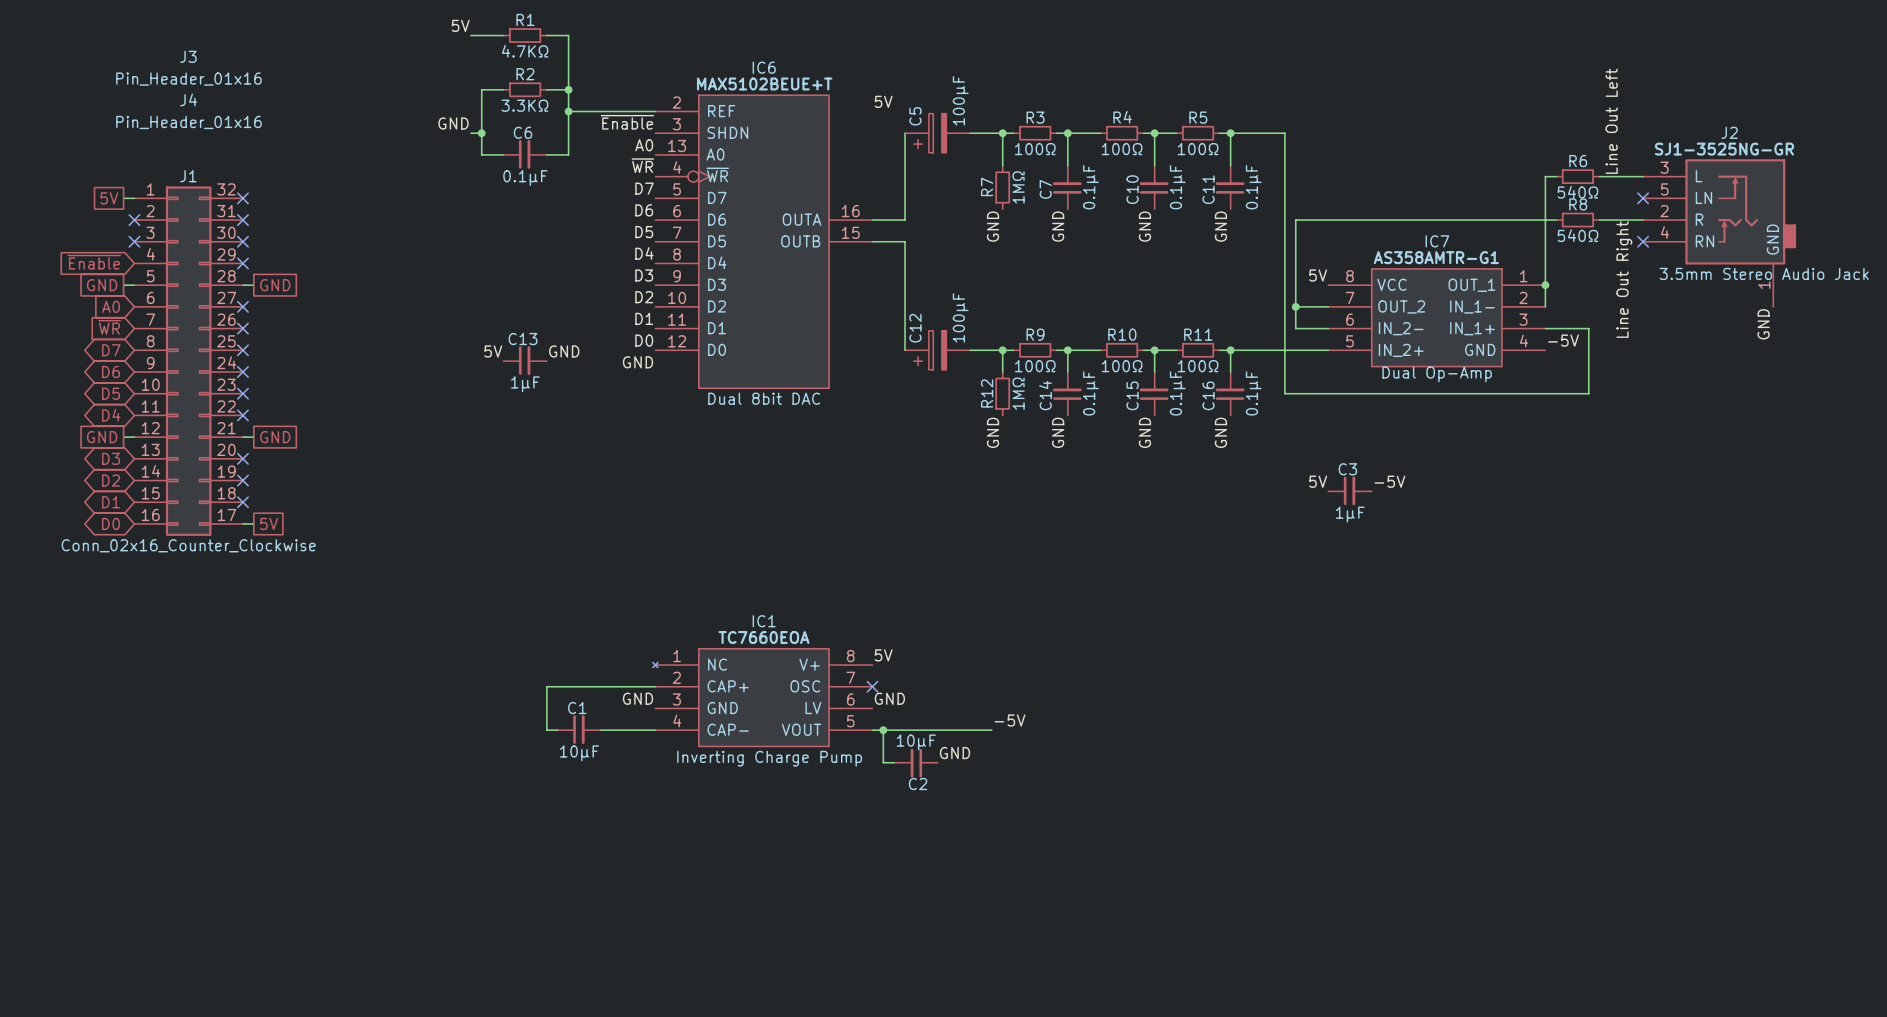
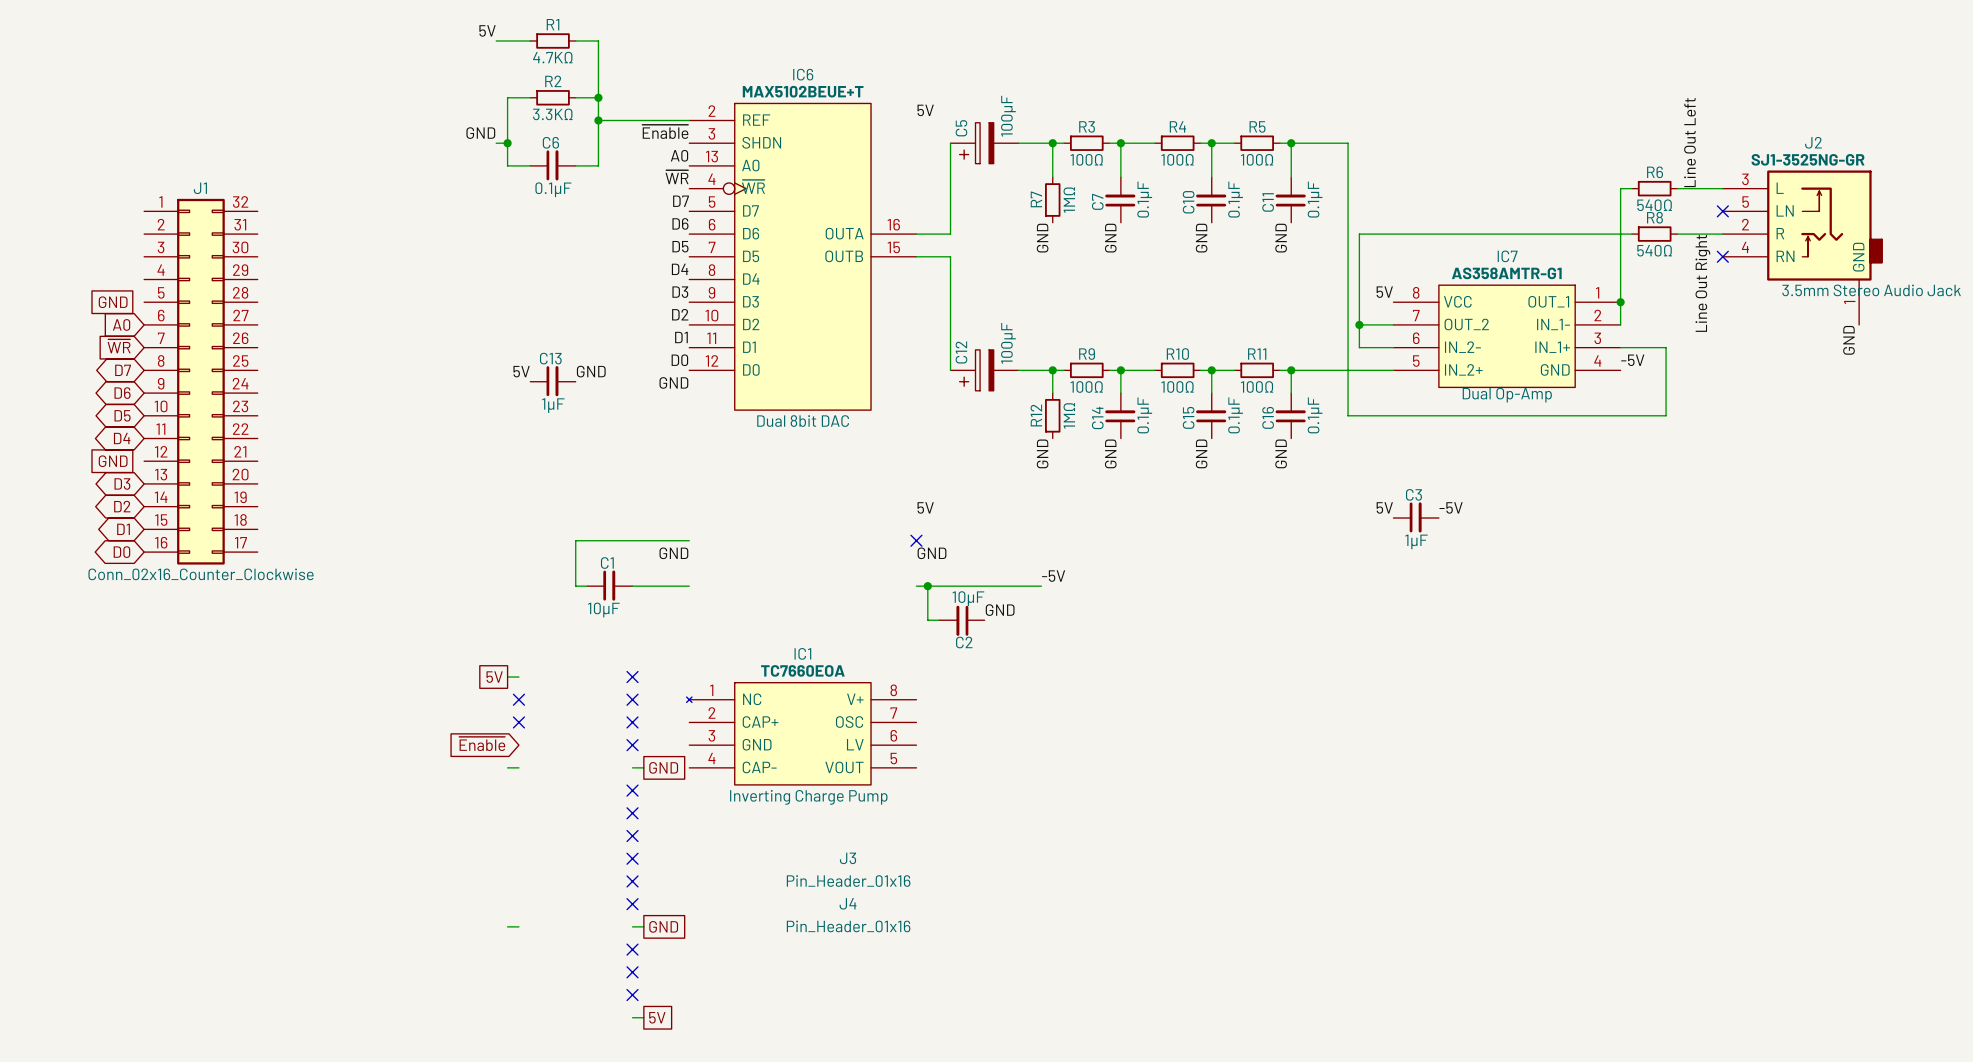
J3 position: (188, 68) -> (848, 869)
J4 position: (188, 111) -> (848, 915)
global label: 5V (109, 198) -> none
wire: (123, 198) (134, 198) -> none
no-connect mark: (242, 198) -> none
no-connect mark: (134, 220) -> none
no-connect mark: (242, 220) -> none
no-connect mark: (134, 241) -> none
no-connect mark: (242, 241) -> none
global label: ~{Enable} (94, 262) -> none
no-connect mark: (242, 263) -> none
wire: (123, 285) (134, 285) -> none
wire: (242, 285) (253, 285) -> none
global label: GND (275, 285) -> none
no-connect mark: (242, 306) -> none
no-connect mark: (242, 328) -> none
no-connect mark: (242, 350) -> none
no-connect mark: (242, 372) -> none
no-connect mark: (242, 393) -> none
no-connect mark: (242, 415) -> none
wire: (123, 437) (134, 437) -> none
wire: (242, 437) (253, 437) -> none
global label: GND (275, 437) -> none
no-connect mark: (242, 458) -> none
no-connect mark: (242, 480) -> none
no-connect mark: (242, 502) -> none
no-connect mark: none -> (916, 540)
wire: (242, 523) (253, 523) -> none
global label: 5V (269, 523) -> none
label: none -> GND (673, 553)
label: none -> GND (932, 553)
wire: none -> (632, 586) (689, 586)
junction: none -> (927, 586)
label: none -> GND (1000, 610)
global label: none -> 5V (494, 677)
wire: none -> (507, 677) (518, 677)
no-connect mark: none -> (632, 677)
label position: 5V (883, 655) -> 5V (925, 507)
no-connect mark: none -> (518, 699)
no-connect mark: none -> (632, 699)
no-connect mark: none -> (518, 722)
no-connect mark: none -> (632, 722)
wire: (655, 686) (546, 686) (546, 730) (557, 730) -> (689, 540) (575, 540) (575, 586) (587, 586)
no-connect mark: (872, 686) -> none
label: GND (638, 698) -> none
label: GND (889, 698) -> none
global label: none -> ~{Enable} (482, 743)
no-connect mark: none -> (632, 745)
label position: -5V (1010, 720) -> -5V (1053, 576)
C1 position: (579, 729) -> (609, 585)
wire: none -> (507, 767) (518, 767)
wire: (611, 730) (655, 730) -> none
global label: none -> GND (663, 767)
wire: (872, 730) (991, 730) -> (916, 586) (1041, 586)
wire: (883, 730) (883, 762) (894, 762) -> (927, 586) (927, 620) (939, 620)
junction: (883, 730) -> none
no-connect mark: none -> (632, 790)
label: GND (954, 753) -> none
C2 position: (915, 763) -> (961, 620)
no-connect mark: none -> (632, 813)
no-connect mark: none -> (632, 836)
no-connect mark: none -> (632, 858)
no-connect mark: none -> (632, 881)
no-connect mark: none -> (632, 904)
wire: none -> (507, 926) (518, 926)
wire: none -> (632, 926) (643, 926)
global label: none -> GND (663, 926)
no-connect mark: none -> (632, 949)
no-connect mark: none -> (632, 972)
no-connect mark: none -> (632, 995)
wire: none -> (632, 1017) (643, 1017)
global label: none -> 5V (657, 1017)

